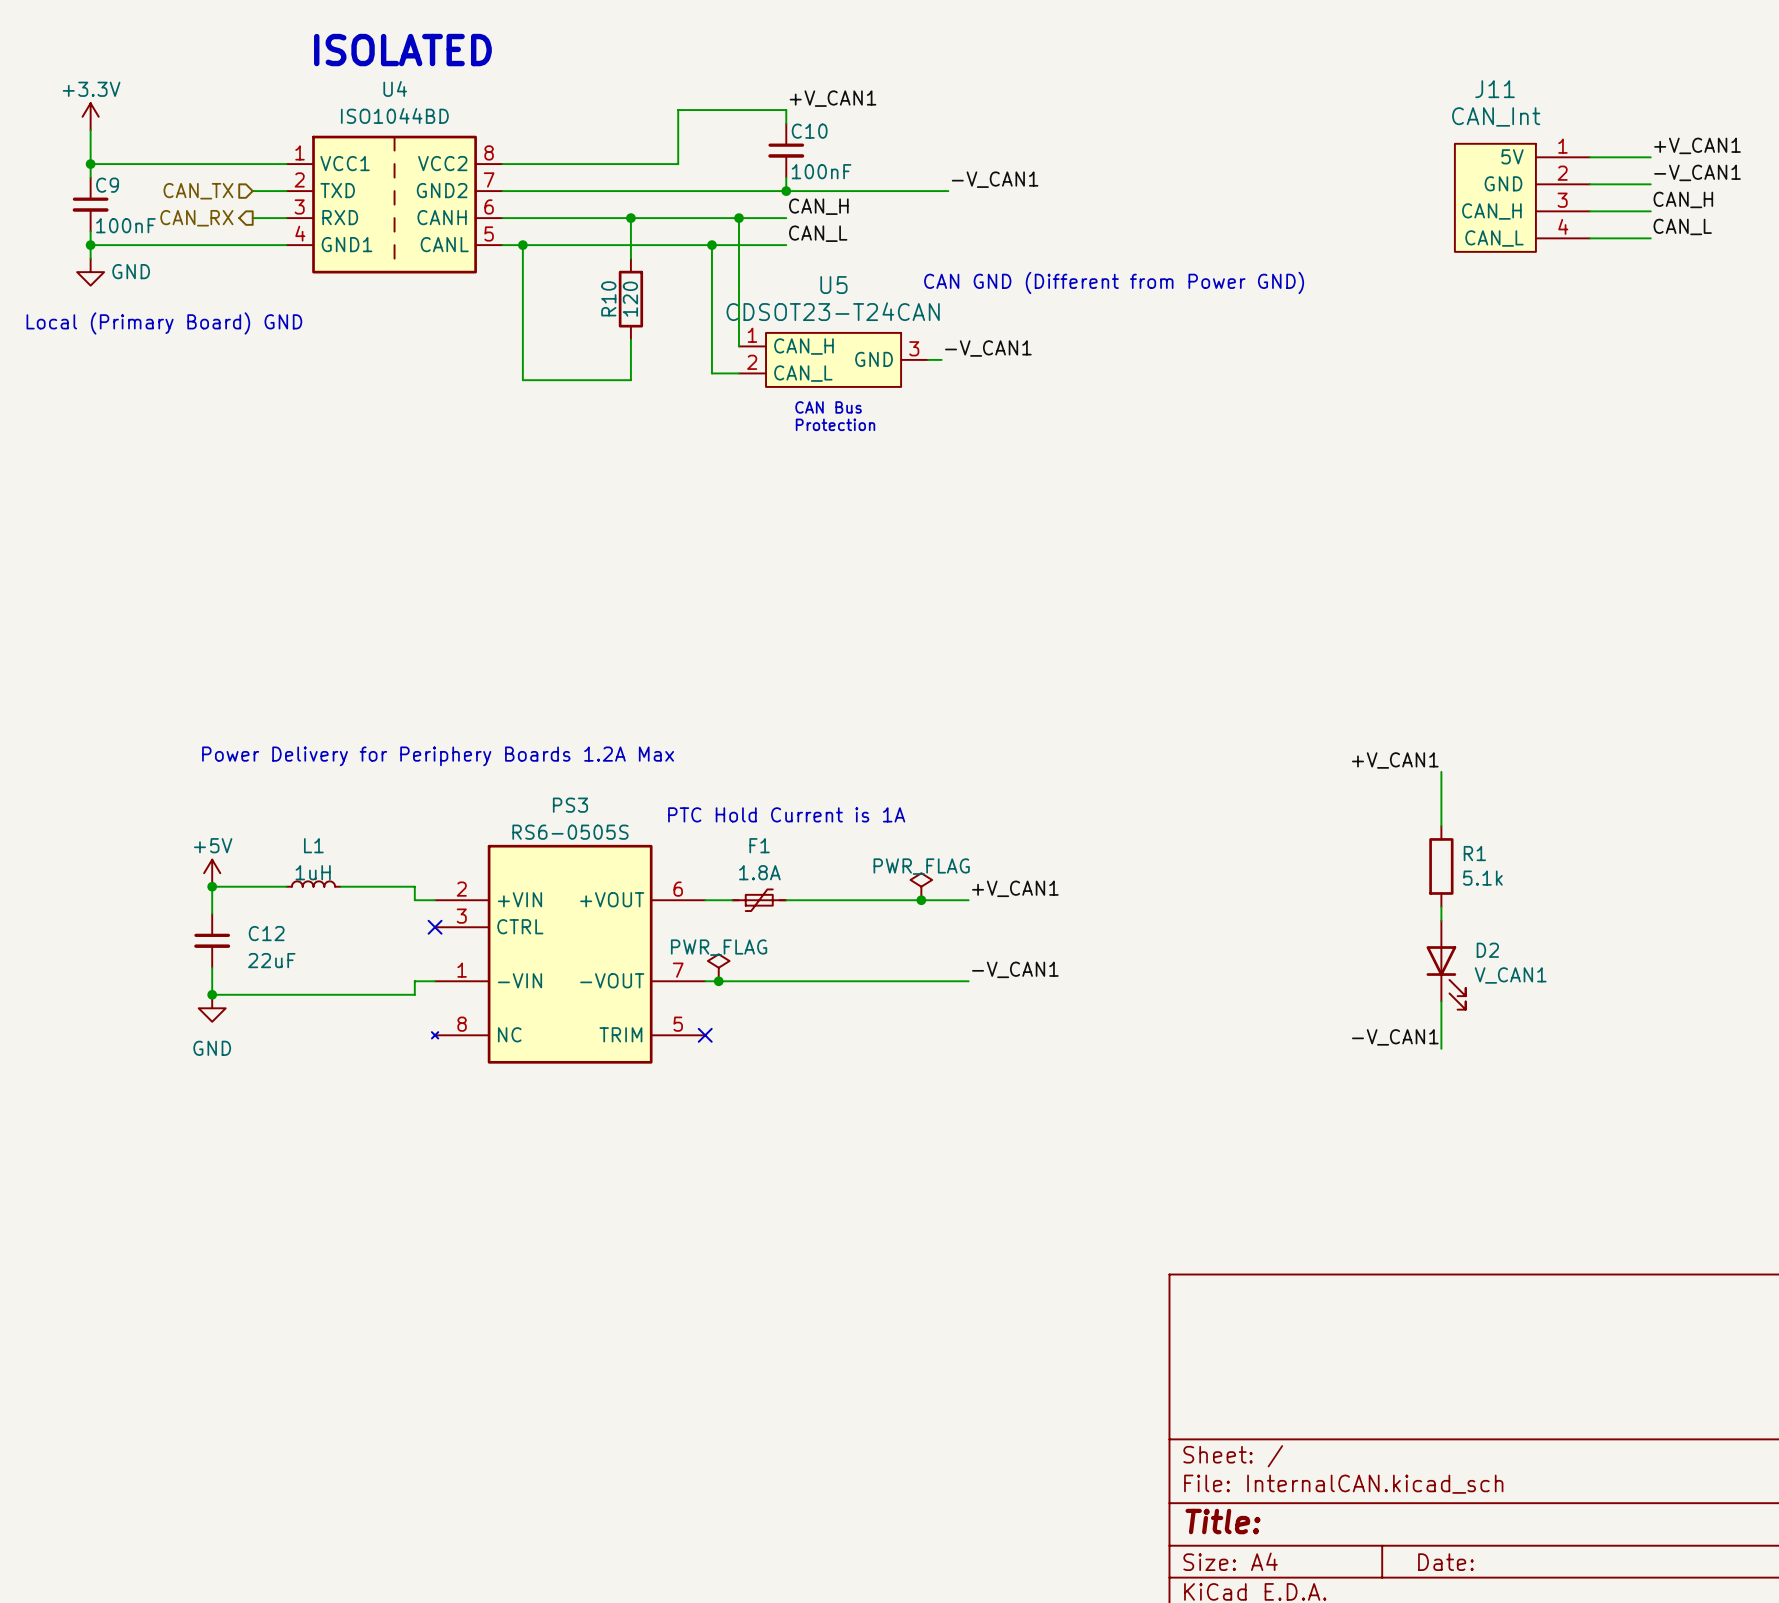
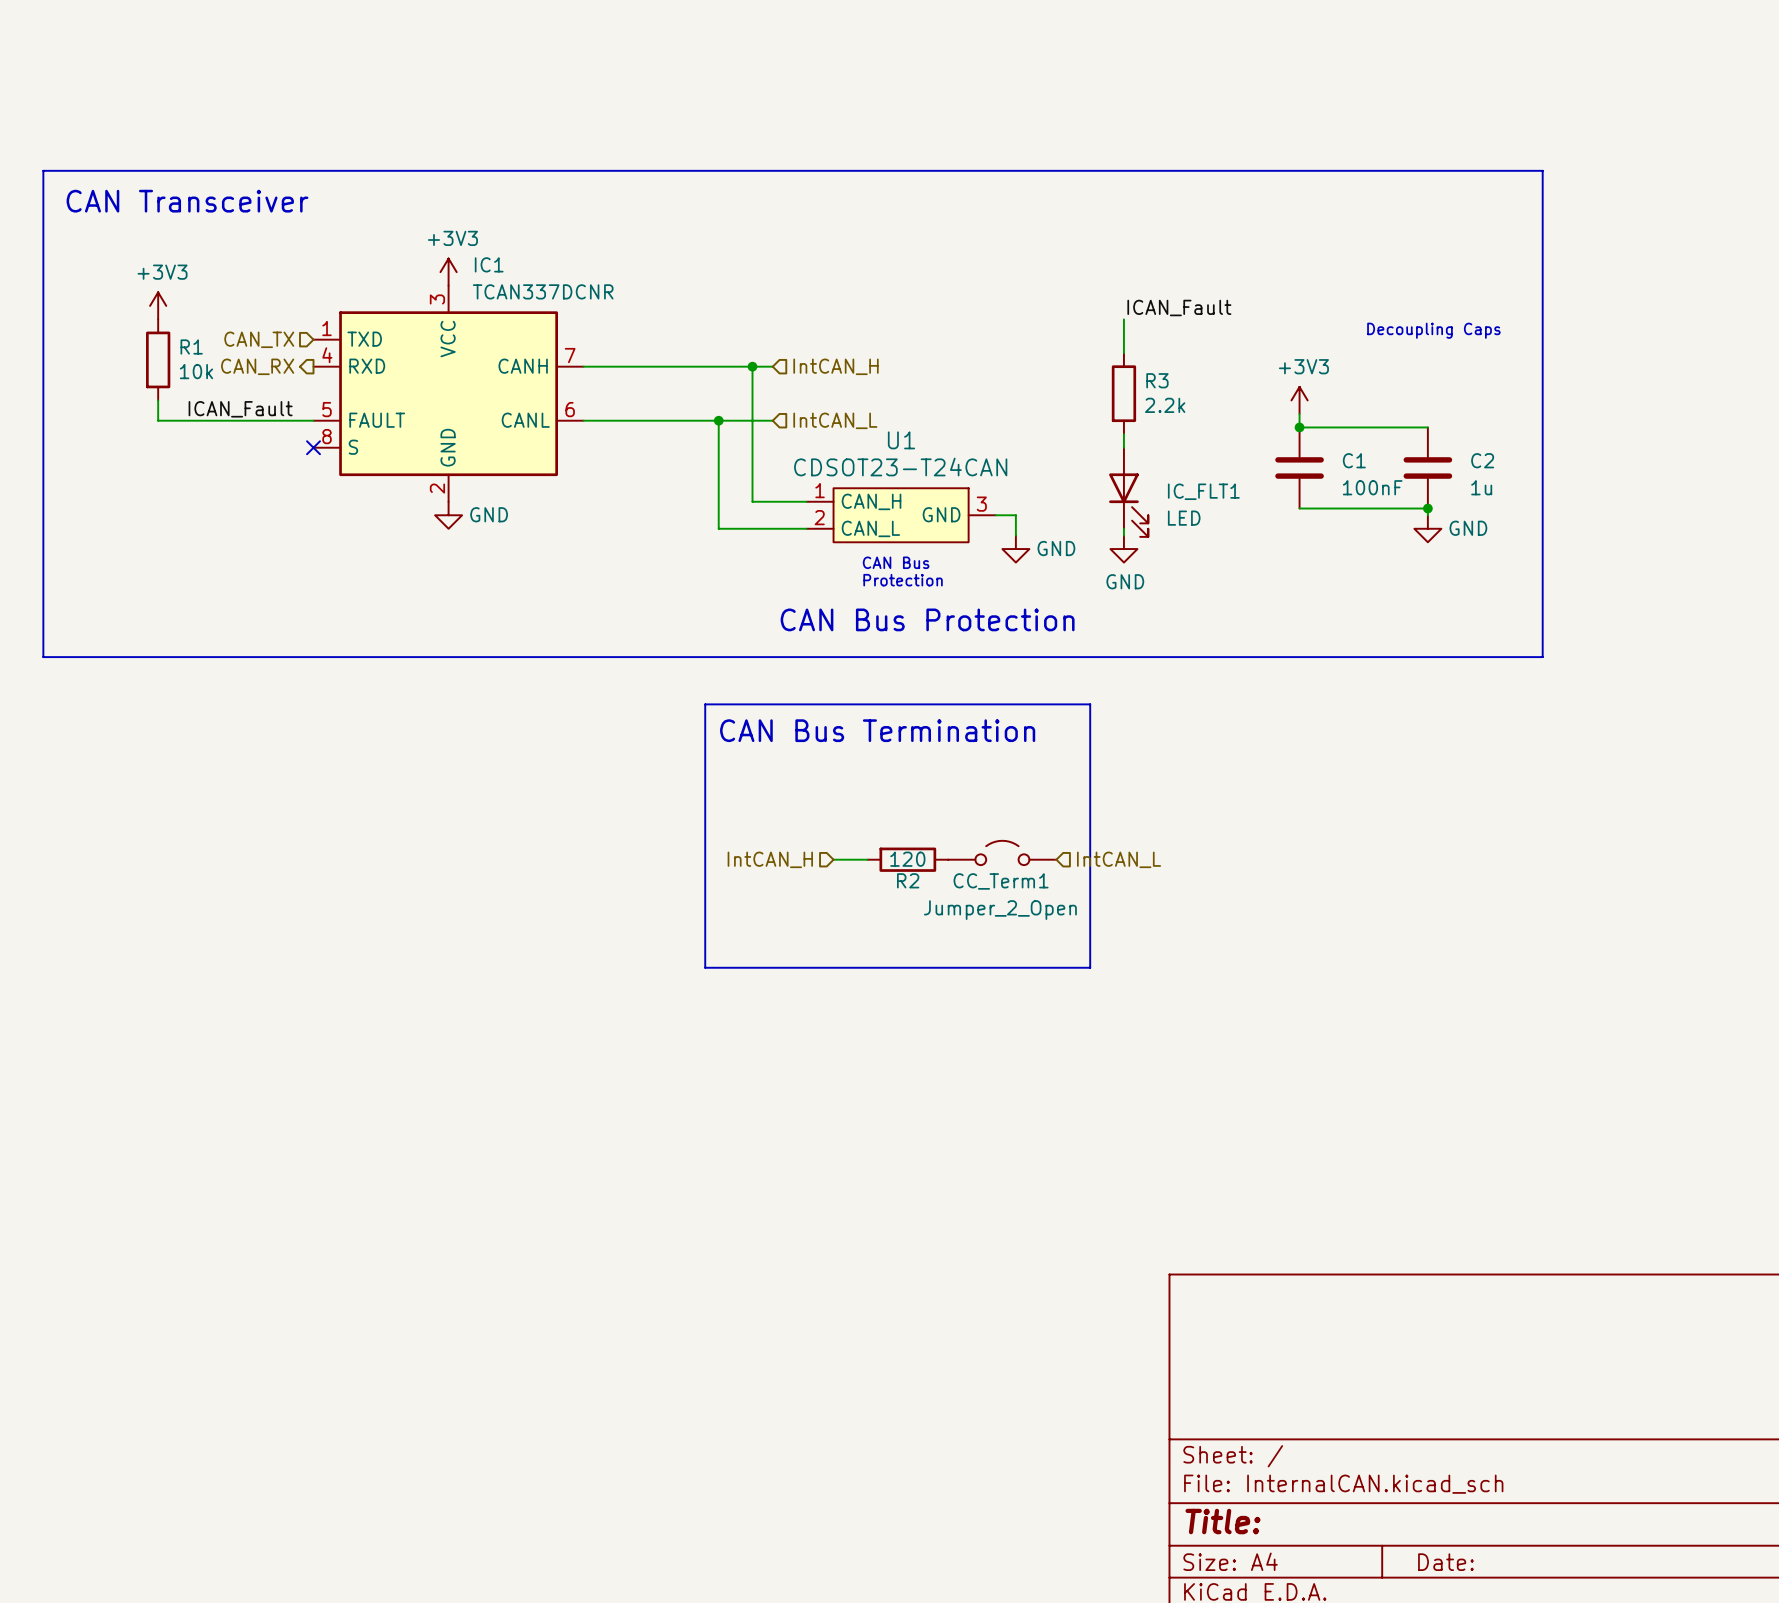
text: ISOLATED (402, 50) -> none
label: +V_CAN1 (833, 98) -> none
power symbol: +3.3V (90, 116) -> none
wire: (786, 123) (786, 110) (678, 110) (678, 164) (502, 164) -> none
wire: (90, 130) (90, 177) -> none
label: +V_CAN1 (1697, 145) -> none
C10: 100nF (786, 150) -> none
wire: (1589, 157) (1650, 157) -> none
wire: (90, 164) (286, 164) -> none
junction: (90, 164) -> none
line: none -> (43, 170) (1542, 170) (1542, 657) (43, 657) (43, 170)
label: -V_CAN1 (1697, 172) -> none
wire: (786, 177) (786, 191) -> none
label: -V_CAN1 (995, 179) -> none
wire: (1589, 184) (1650, 184) -> none
hierarchical label position: CAN_TX (198, 191) -> CAN_TX (259, 339)
wire: (252, 191) (286, 191) -> none
wire: (502, 191) (948, 191) -> none
junction: (786, 191) -> none
J11: CAN_Int (1522, 197) -> none
label: CAN_H (1683, 199) -> none
text: none -> CAN Transceiver (187, 201)
C9: 100nF (90, 204) -> none
U4: ISO1044BD (394, 204) -> none
label: CAN_H (818, 206) -> none
wire: (1589, 211) (1650, 211) -> none
hierarchical label position: CAN_RX (196, 218) -> CAN_RX (257, 366)
wire: (252, 218) (286, 218) -> none
wire: (502, 218) (786, 218) -> none
wire: (630, 218) (630, 258) -> none
junction: (630, 218) -> none
wire: (738, 218) (738, 346) -> none
junction: (738, 218) -> none
label: CAN_L (1682, 226) -> none
wire: (90, 231) (90, 258) -> none
label: CAN_L (818, 233) -> none
wire: (1589, 238) (1650, 238) -> none
wire: (90, 245) (286, 245) -> none
junction: (90, 245) -> none
wire: (502, 245) (786, 245) -> none
wire: (522, 245) (522, 380) (630, 380) (630, 339) -> none
junction: (522, 245) -> none
wire: (711, 245) (711, 373) (738, 373) -> none
junction: (711, 245) -> none
power symbol: GND (90, 272) -> none
power symbol: none -> +3V3 (448, 272)
text: CAN GND (Different from Power GND) (1114, 282) -> none
R10: 120 (630, 299) -> none
power symbol: none -> +3V3 (158, 305)
label: none -> ICAN_Fault (1179, 307)
wire: none -> (1123, 319) (1123, 353)
text: Local (Primary Board) GND (164, 323) -> none
text: none -> Decoupling Caps (1433, 330)
label: -V_CAN1 (988, 348) -> none
U5: CDSOT23-T24CAN (833, 359) -> none
wire: (928, 359) (941, 359) -> none
wire: none -> (583, 366) (772, 366)
wire: none -> (752, 366) (752, 501) (806, 501)
junction: none -> (752, 366)
hierarchical label: none -> IntCAN_H (836, 366)
IC1: none -> TCAN337DCNR (448, 393)
R3: none -> 2.2k (1123, 393)
wire: none -> (158, 400) (158, 420) (313, 420)
power symbol: none -> +3V3 (1299, 400)
text position: CAN Bus (828, 407) -> CAN Bus (896, 562)
label: none -> ICAN_Fault (240, 409)
wire: none -> (1299, 413) (1299, 427) (1427, 427)
wire: none -> (583, 420) (772, 420)
wire: none -> (718, 420) (718, 528) (806, 528)
junction: none -> (718, 420)
hierarchical label: none -> IntCAN_L (835, 420)
text position: Protection (835, 424) -> Protection (903, 580)
junction: none -> (1299, 427)
wire: none -> (1123, 434) (1123, 447)
no-connect mark: none -> (313, 447)
C1: none -> 100nF (1299, 467)
C2: none -> 1u (1427, 467)
IC_FLT1: none -> LED (1128, 492)
wire: none -> (1299, 508) (1427, 508) (1427, 515)
junction: none -> (1427, 508)
power symbol: none -> GND (448, 515)
U1: none -> CDSOT23-T24CAN (901, 515)
wire: none -> (995, 515) (1015, 515) (1015, 535)
wire: none -> (1123, 528) (1123, 535)
power symbol: none -> GND (1427, 528)
power symbol: none -> GND (1015, 549)
power symbol: none -> GND (1123, 549)
text: none -> CAN Bus Protection (927, 619)
line: none -> (705, 704) (1090, 704) (1090, 967) (705, 967) (705, 704)
text: none -> CAN Bus Termination (877, 730)
text: Power Delivery for Periphery Boards 1.2A Max (438, 756) -> none
label: +V_CAN1 (1395, 760) -> none
wire: (1441, 771) (1441, 825) -> none
text: PTC Hold Current is 1A (786, 814) -> none
CC_Term1: none -> Jumper_2_Open (1002, 852)
hierarchical label: none -> IntCAN_H (770, 859)
wire: none -> (833, 859) (867, 859)
R2: none -> 120 (907, 859)
hierarchical label: none -> IntCAN_L (1119, 859)
R1 position: (1441, 866) -> (158, 359)
power symbol: +5V (212, 873) -> none
R1 value: 5.1k (1482, 878) -> 10k (196, 371)
L1: 1uH (313, 884) -> none
junction: (212, 886) -> none
wire: (286, 886) (212, 886) (212, 913) -> none
wire: (340, 886) (414, 886) (414, 900) (435, 900) -> none
power symbol: PWR_FLAG (921, 886) -> none
label: +V_CAN1 (1015, 888) -> none
wire: (705, 900) (732, 900) -> none
F1: 1.8A (759, 900) -> none
wire: (786, 900) (968, 900) -> none
junction: (921, 900) -> none
wire: (1441, 906) (1441, 920) -> none
no-connect mark: (435, 927) -> none
C12: 22uF (212, 940) -> none
PS3: RS6-0505S (568, 954) -> none
D2: V_CAN1 (1446, 965) -> none
wire: (212, 967) (212, 994) (414, 994) (414, 981) (435, 981) -> none
power symbol: PWR_FLAG (718, 967) -> none
label: -V_CAN1 (1015, 969) -> none
wire: (705, 981) (968, 981) -> none
junction: (718, 981) -> none
junction: (212, 994) -> none
wire: (1441, 1001) (1441, 1048) -> none
power symbol: GND (212, 1008) -> none
no-connect mark: (705, 1035) -> none
label: -V_CAN1 (1395, 1037) -> none

